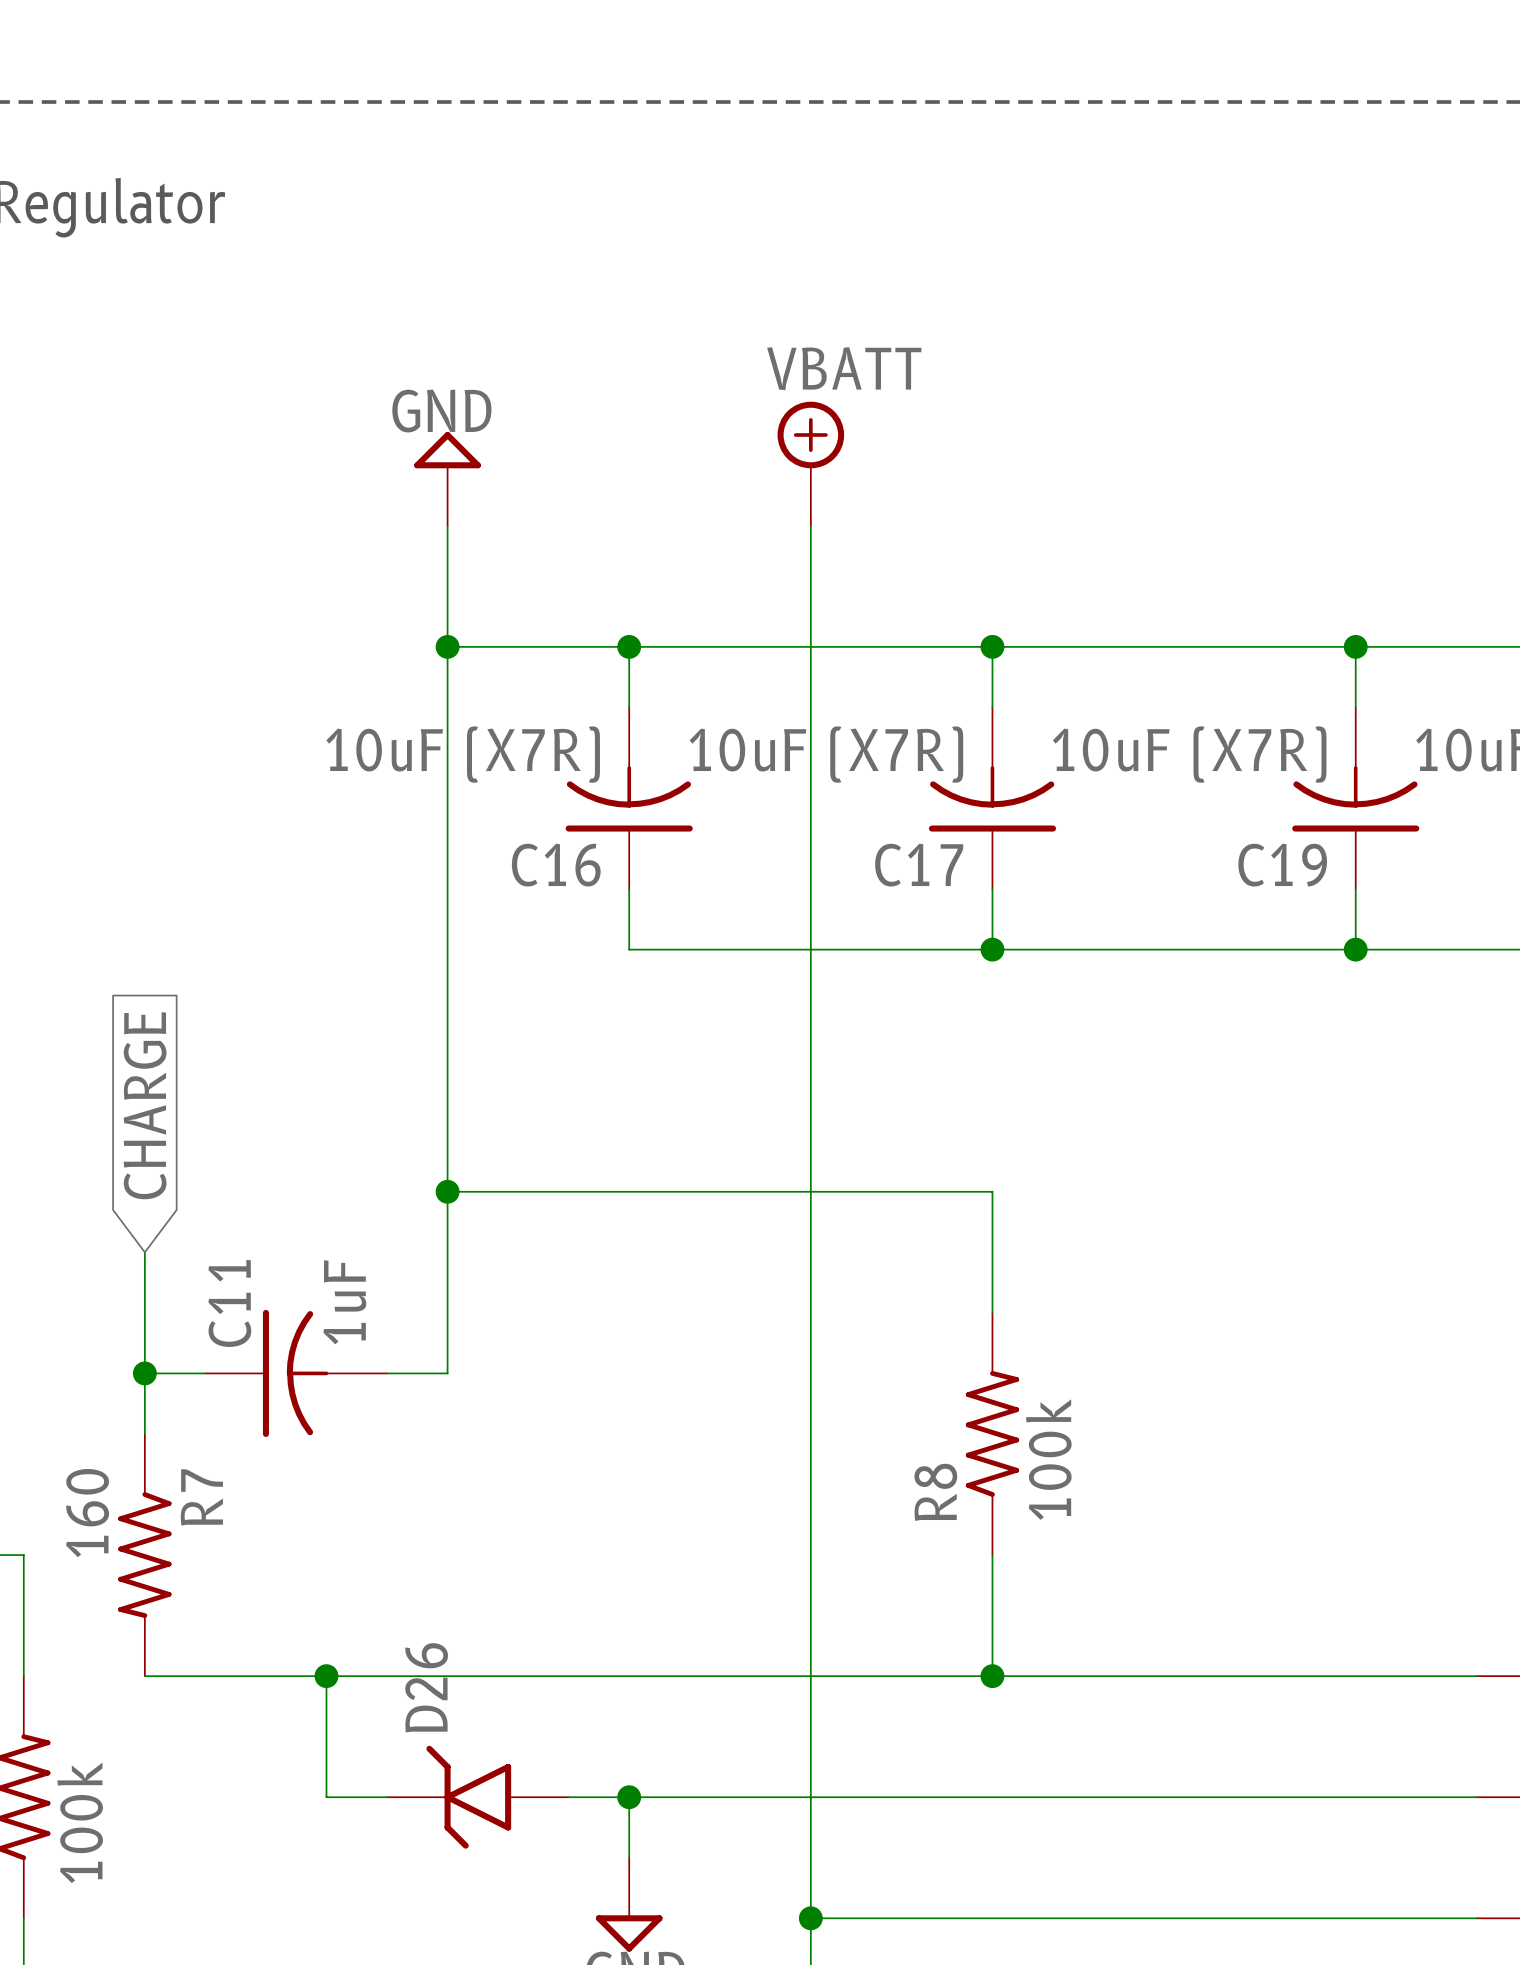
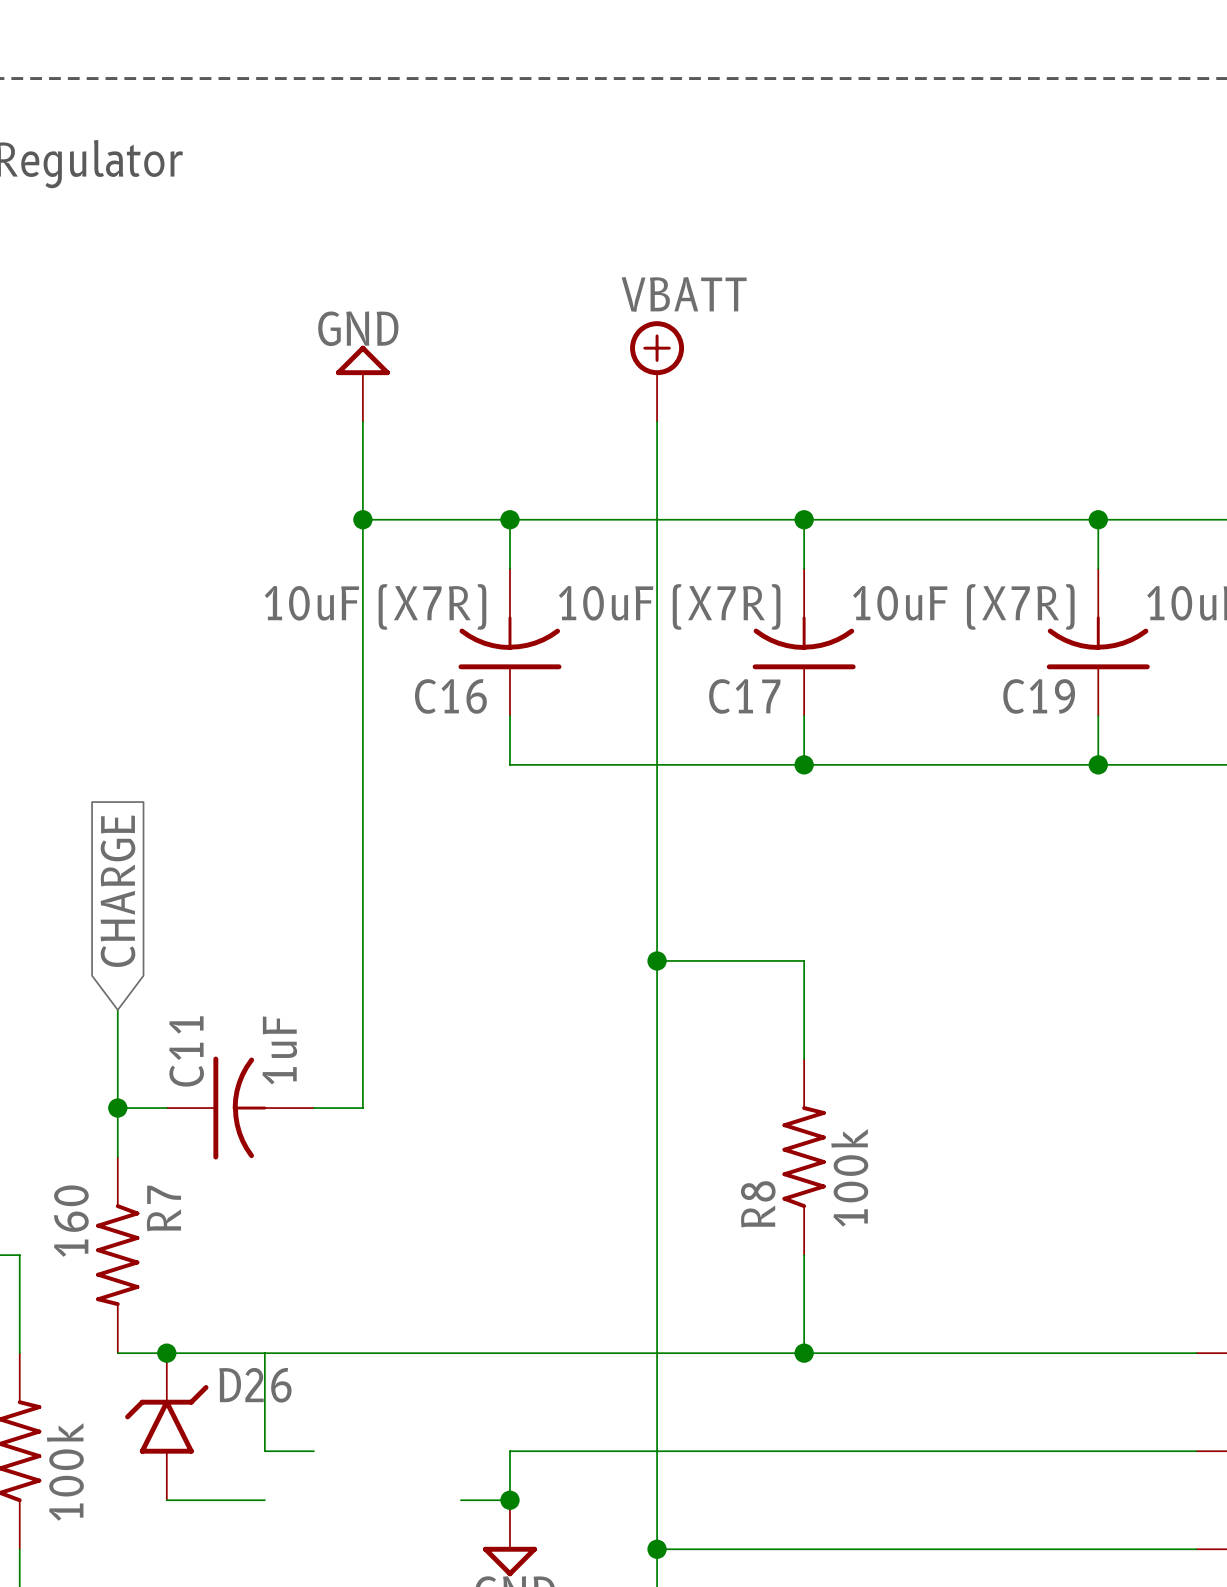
wire: (447, 1191) (810, 1191) -> none
junction: (447, 1191) -> none
junction: none -> (657, 960)
junction position: (326, 1676) -> (166, 1353)
D26 rotation: 0° (468, 1797) -> 90° clockwise (166, 1419)
D26 position: (477, 1797) -> (166, 1426)
wire: (568, 1797) (629, 1797) -> (460, 1500) (509, 1500)
junction position: (629, 1797) -> (509, 1500)
wire: none -> (166, 1500) (264, 1500)

